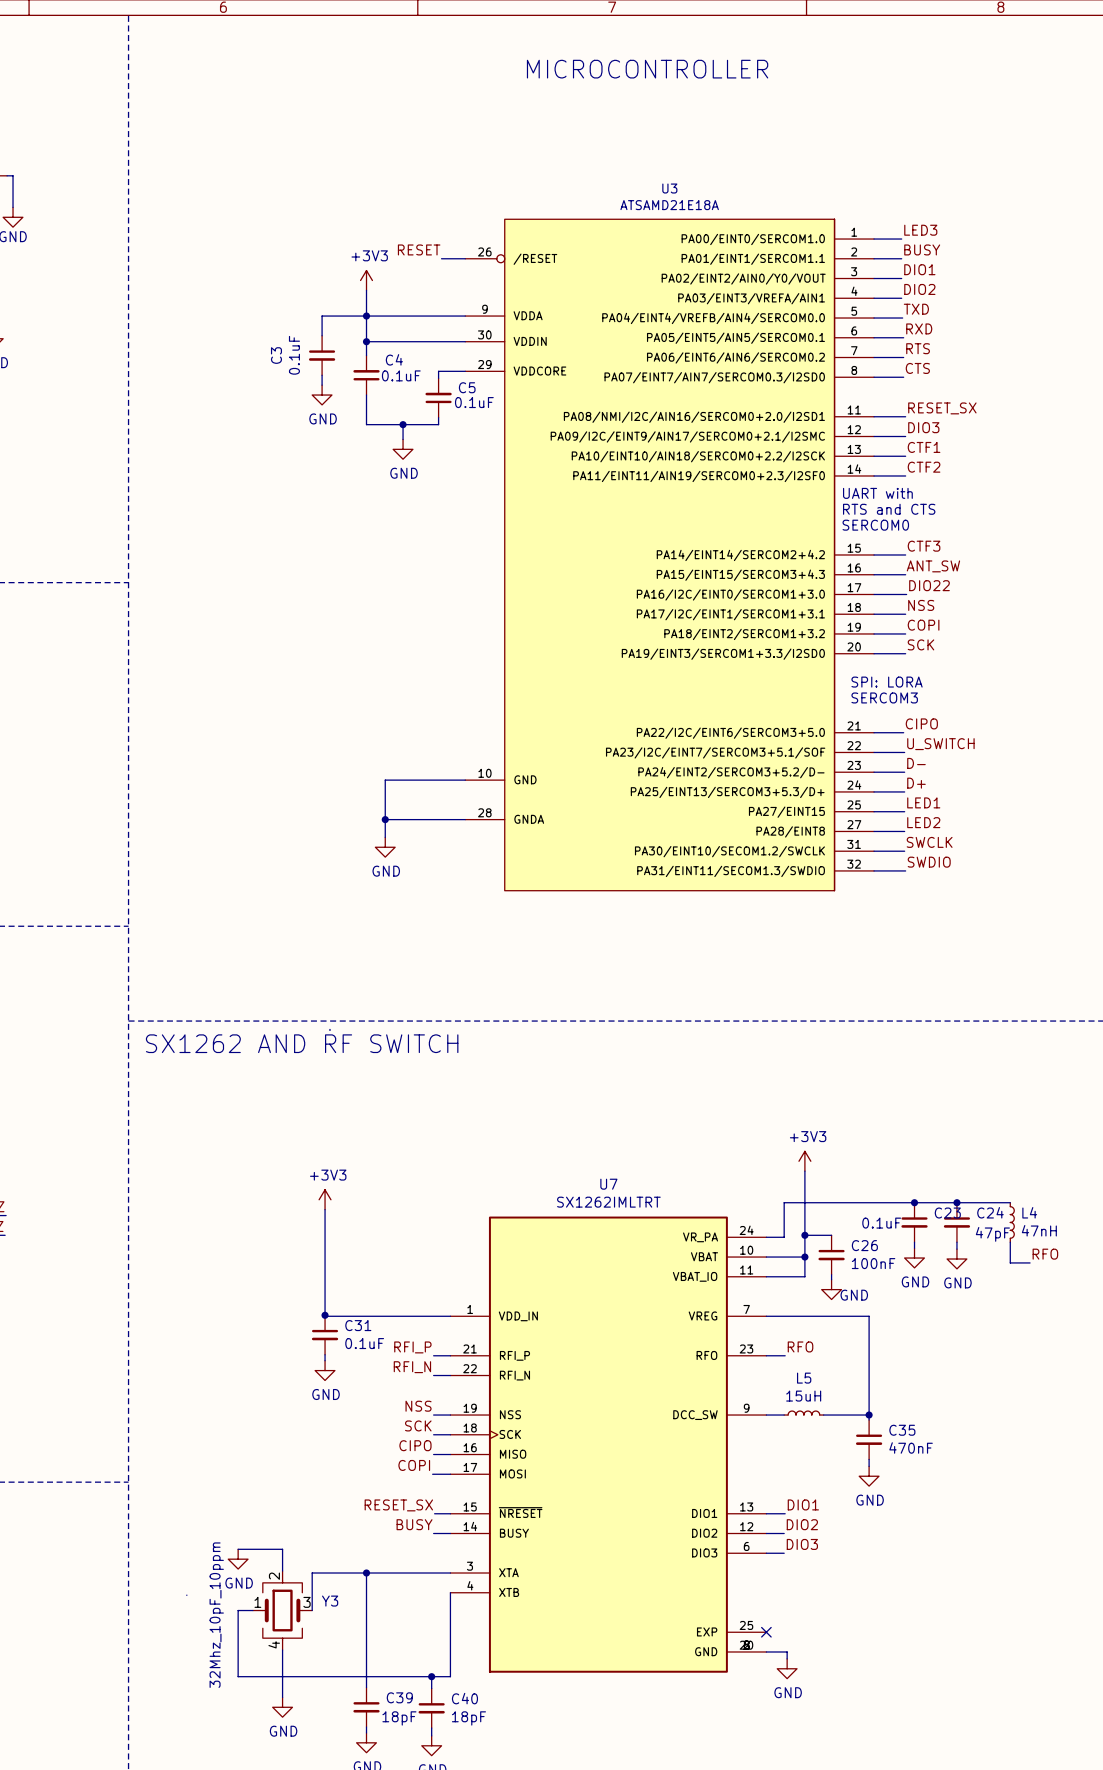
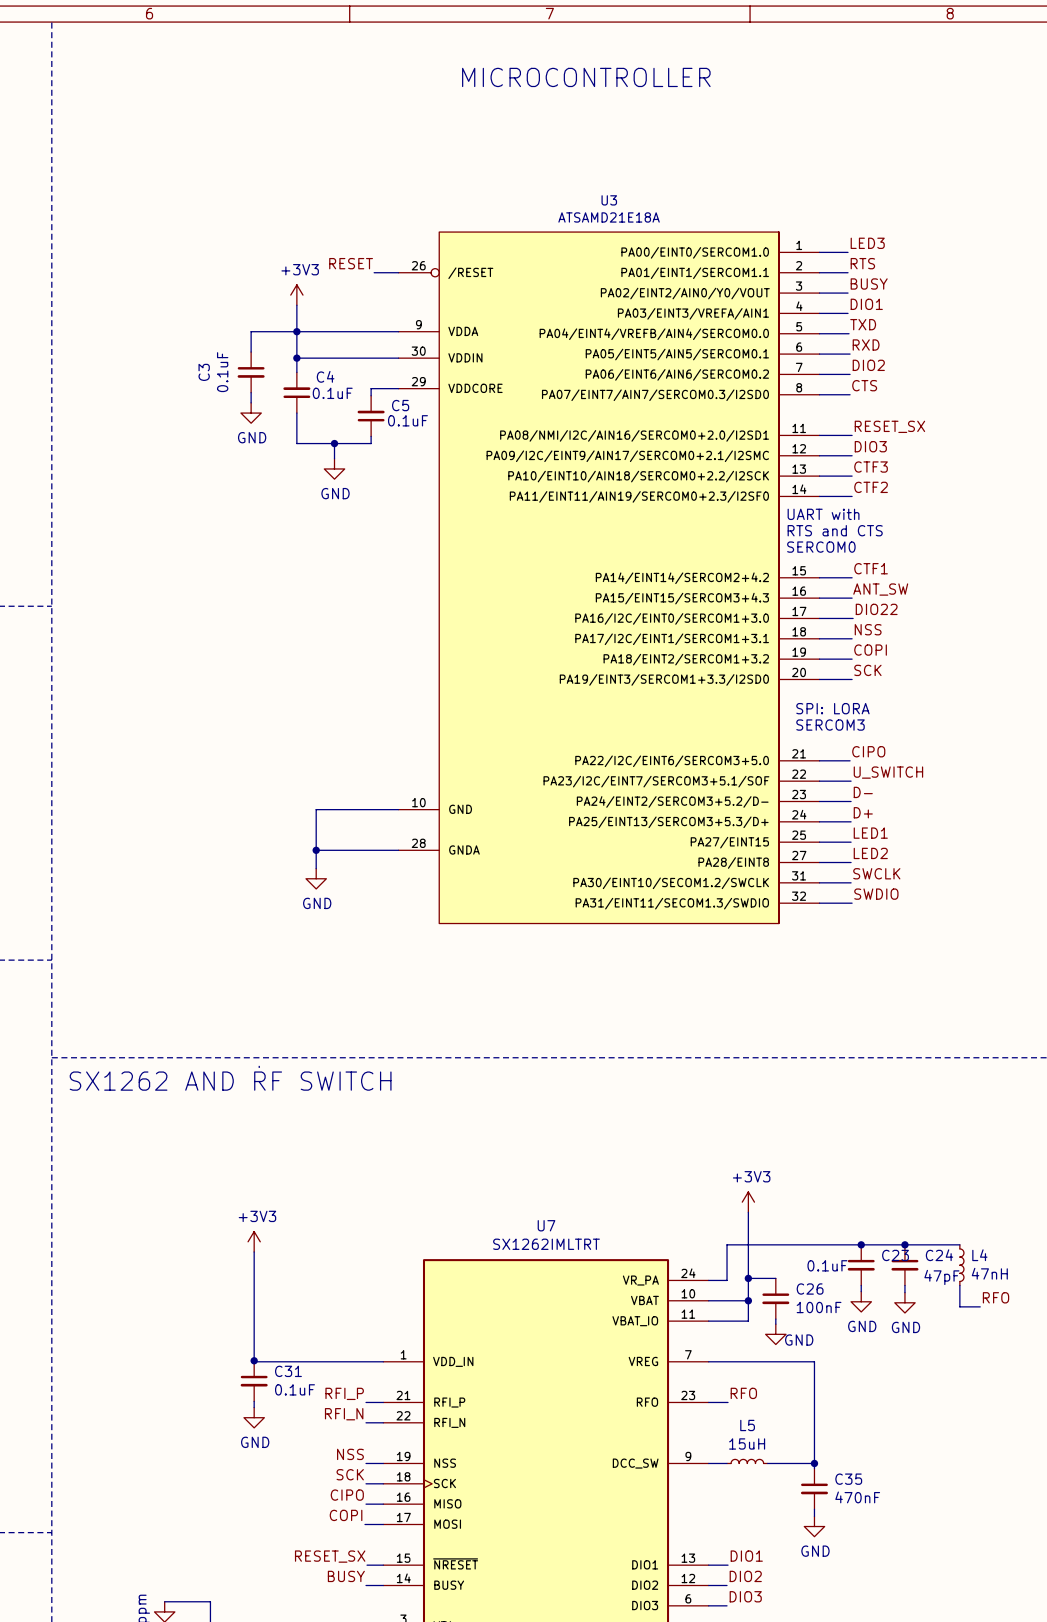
label: BUSY (922, 249) -> RTS (862, 263)
label: DIO1 (919, 269) -> BUSY (869, 283)
label: DIO2 (919, 289) -> DIO1 (866, 304)
label: RTS (918, 348) -> DIO2 (868, 365)
label: CTF1 (924, 447) -> CTF3 (871, 467)
label: CTF3 (924, 546) -> CTF1 (871, 568)

